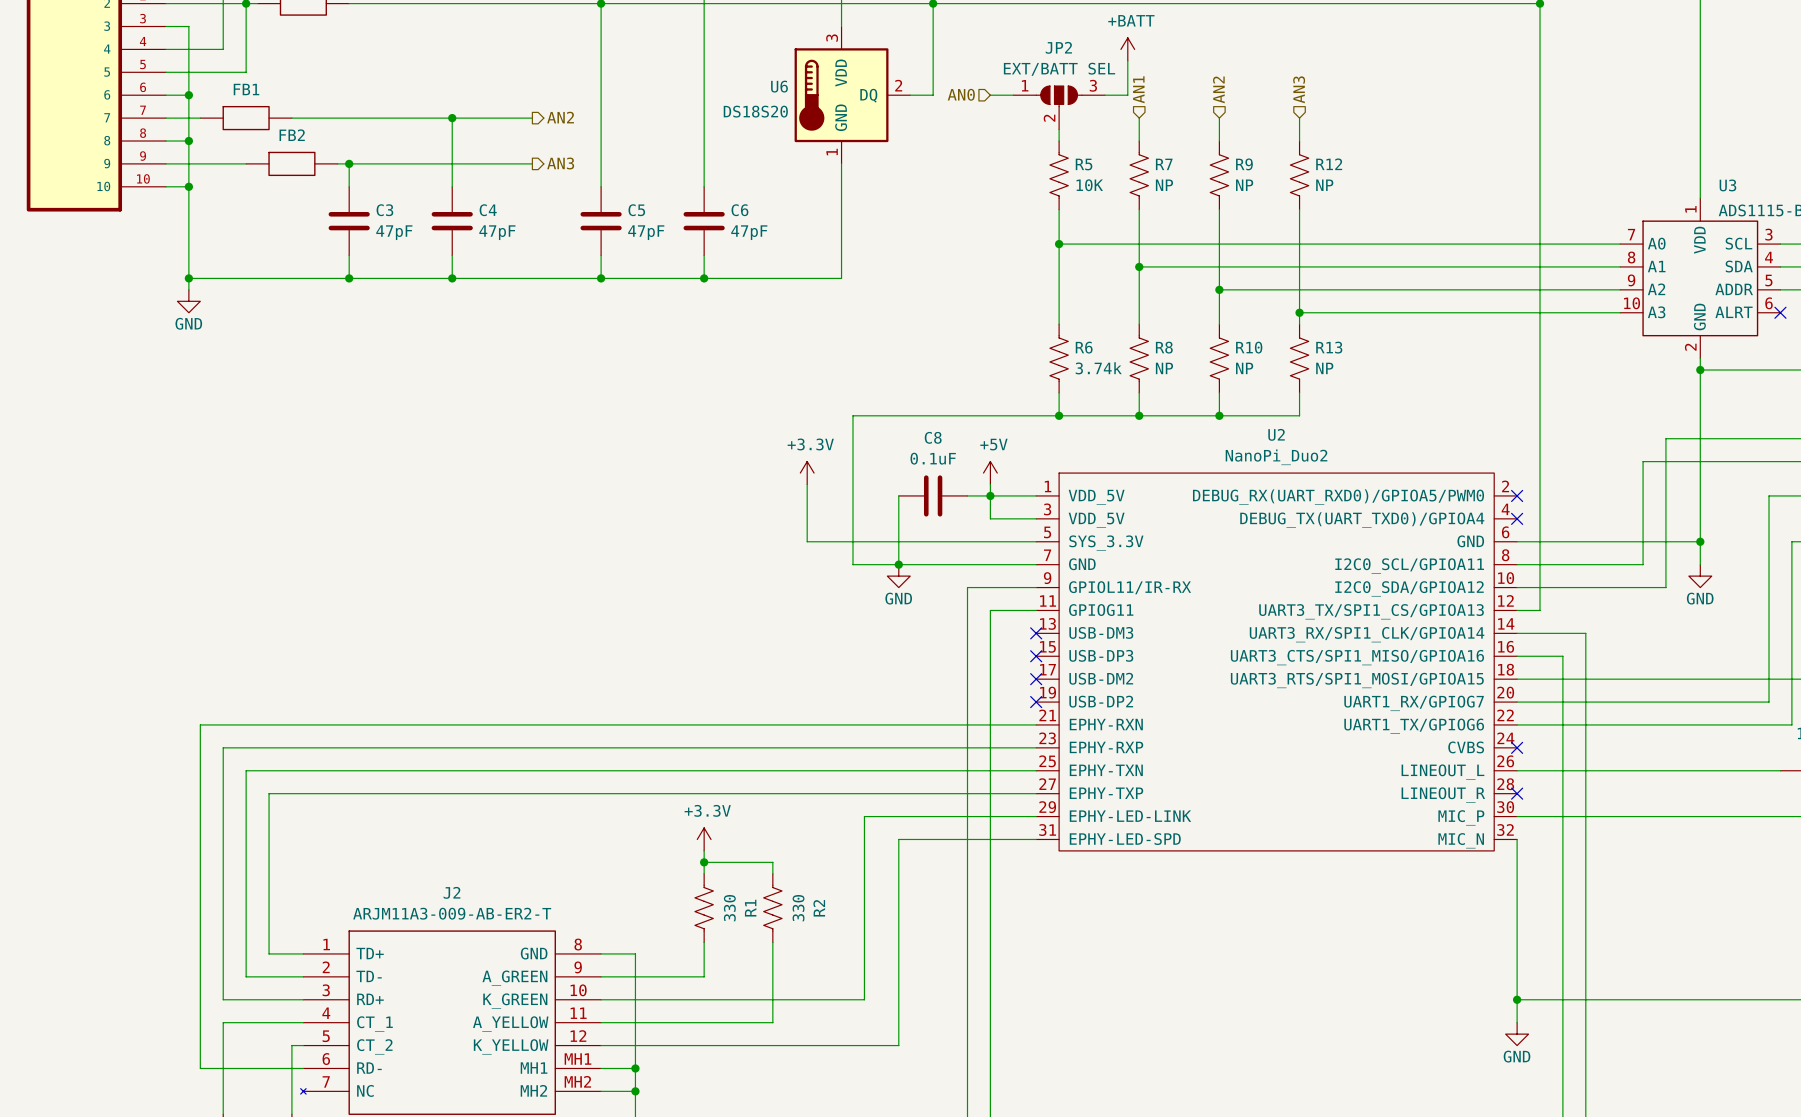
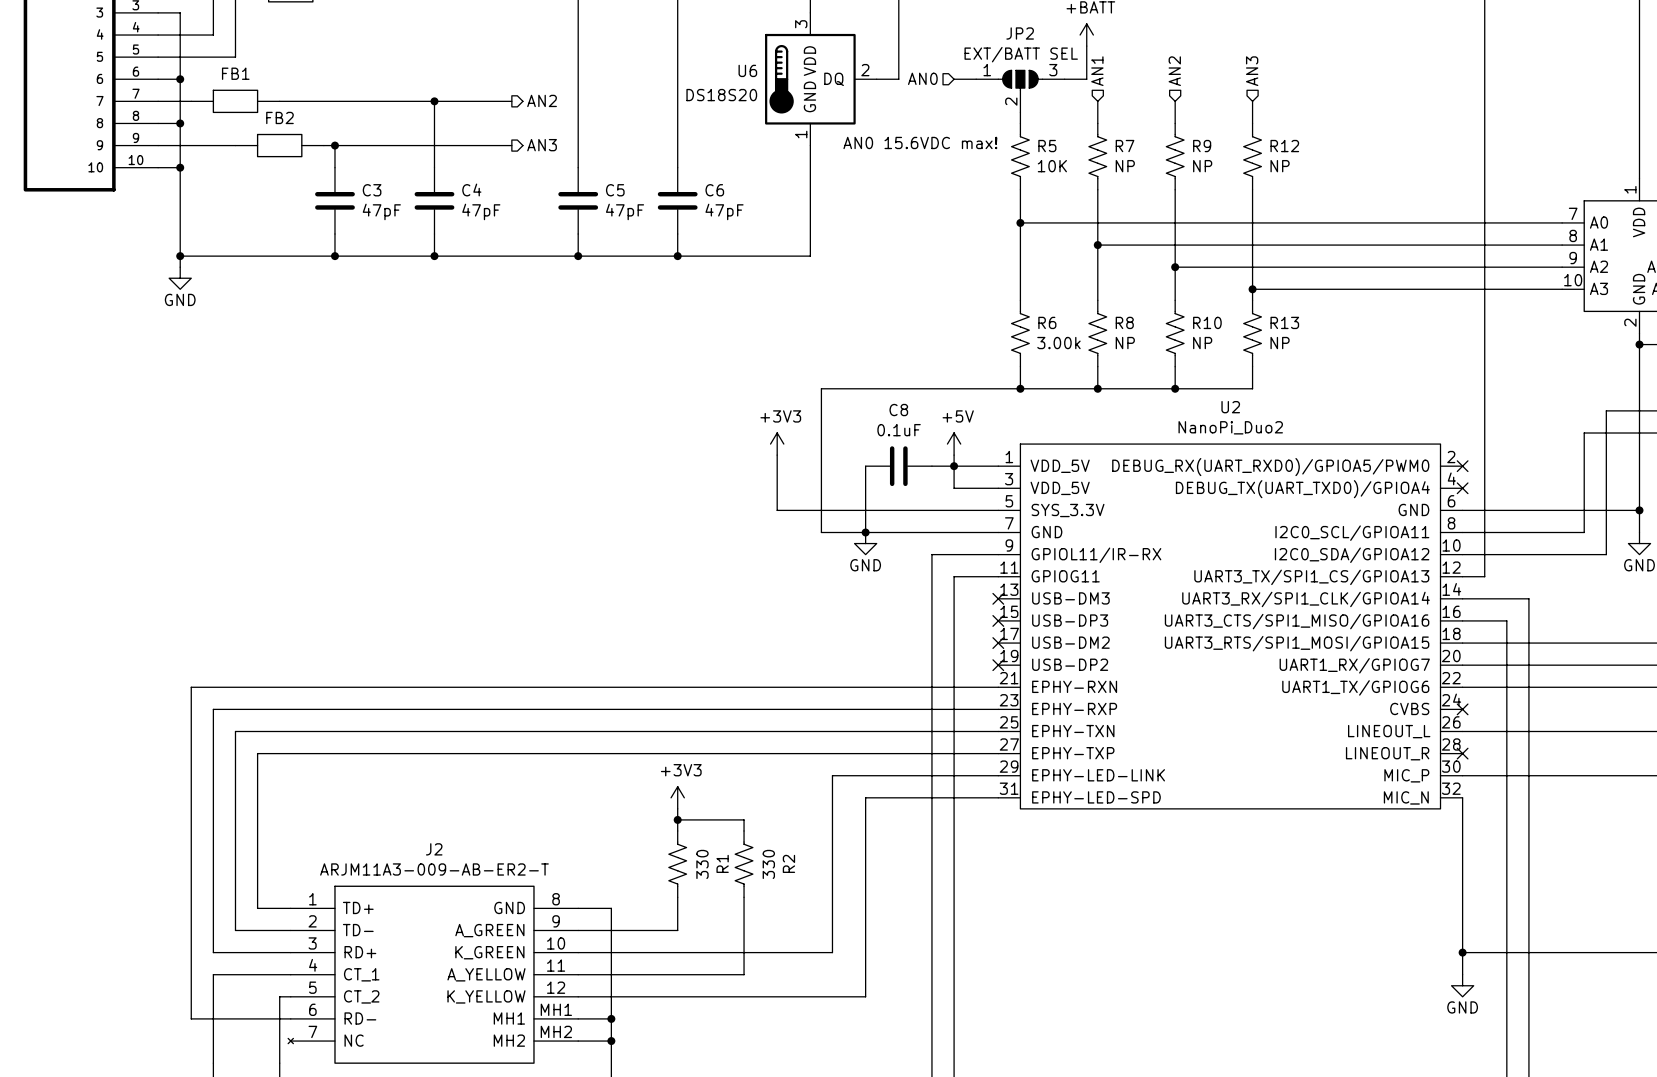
text: none -> AN0 15.6VDC max! (920, 142)
R6 value: 3.74k (1098, 368) -> 3.00k (1058, 343)
power symbol: +3.3V (807, 473) -> +3V3 (777, 444)
power symbol: +3.3V (704, 839) -> +3V3 (677, 797)

